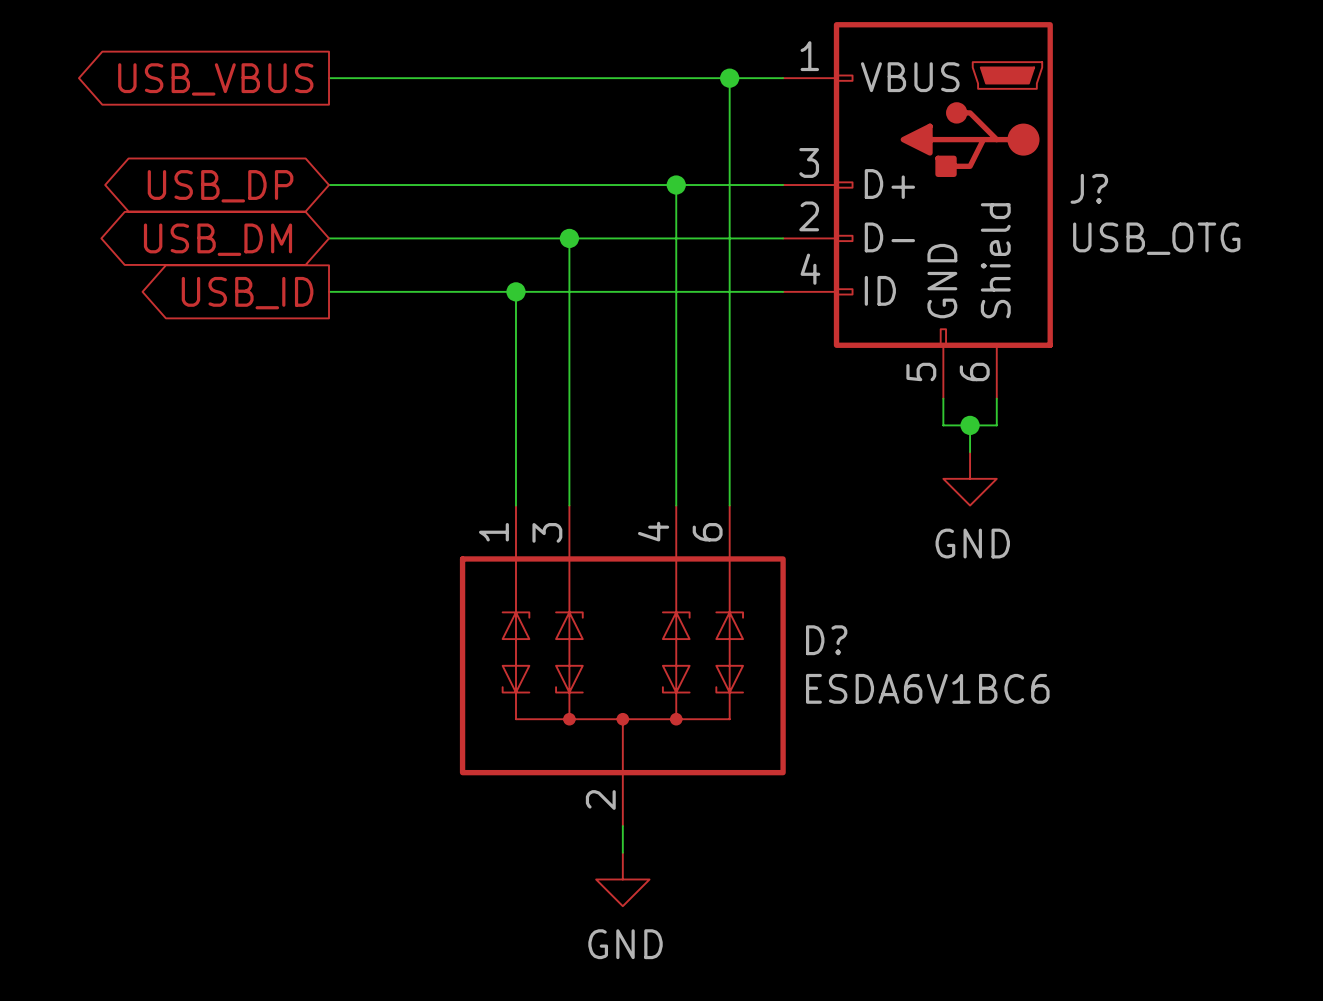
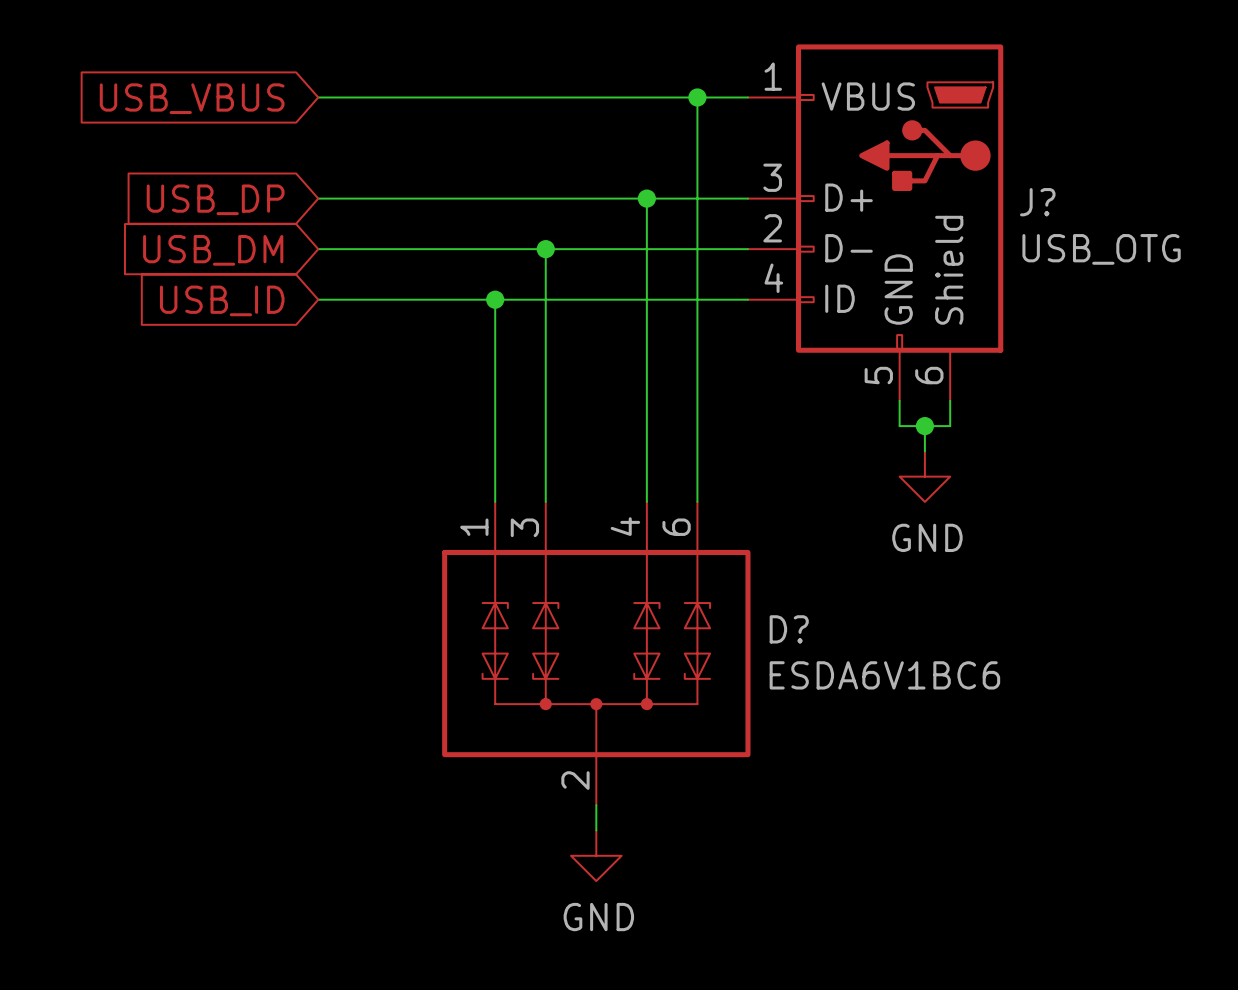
global label shape: output (215, 79) -> input (192, 98)
global label shape: bidirectional (220, 186) -> input (215, 199)
global label shape: bidirectional (217, 239) -> input (213, 250)
global label shape: output (247, 293) -> input (222, 300)

